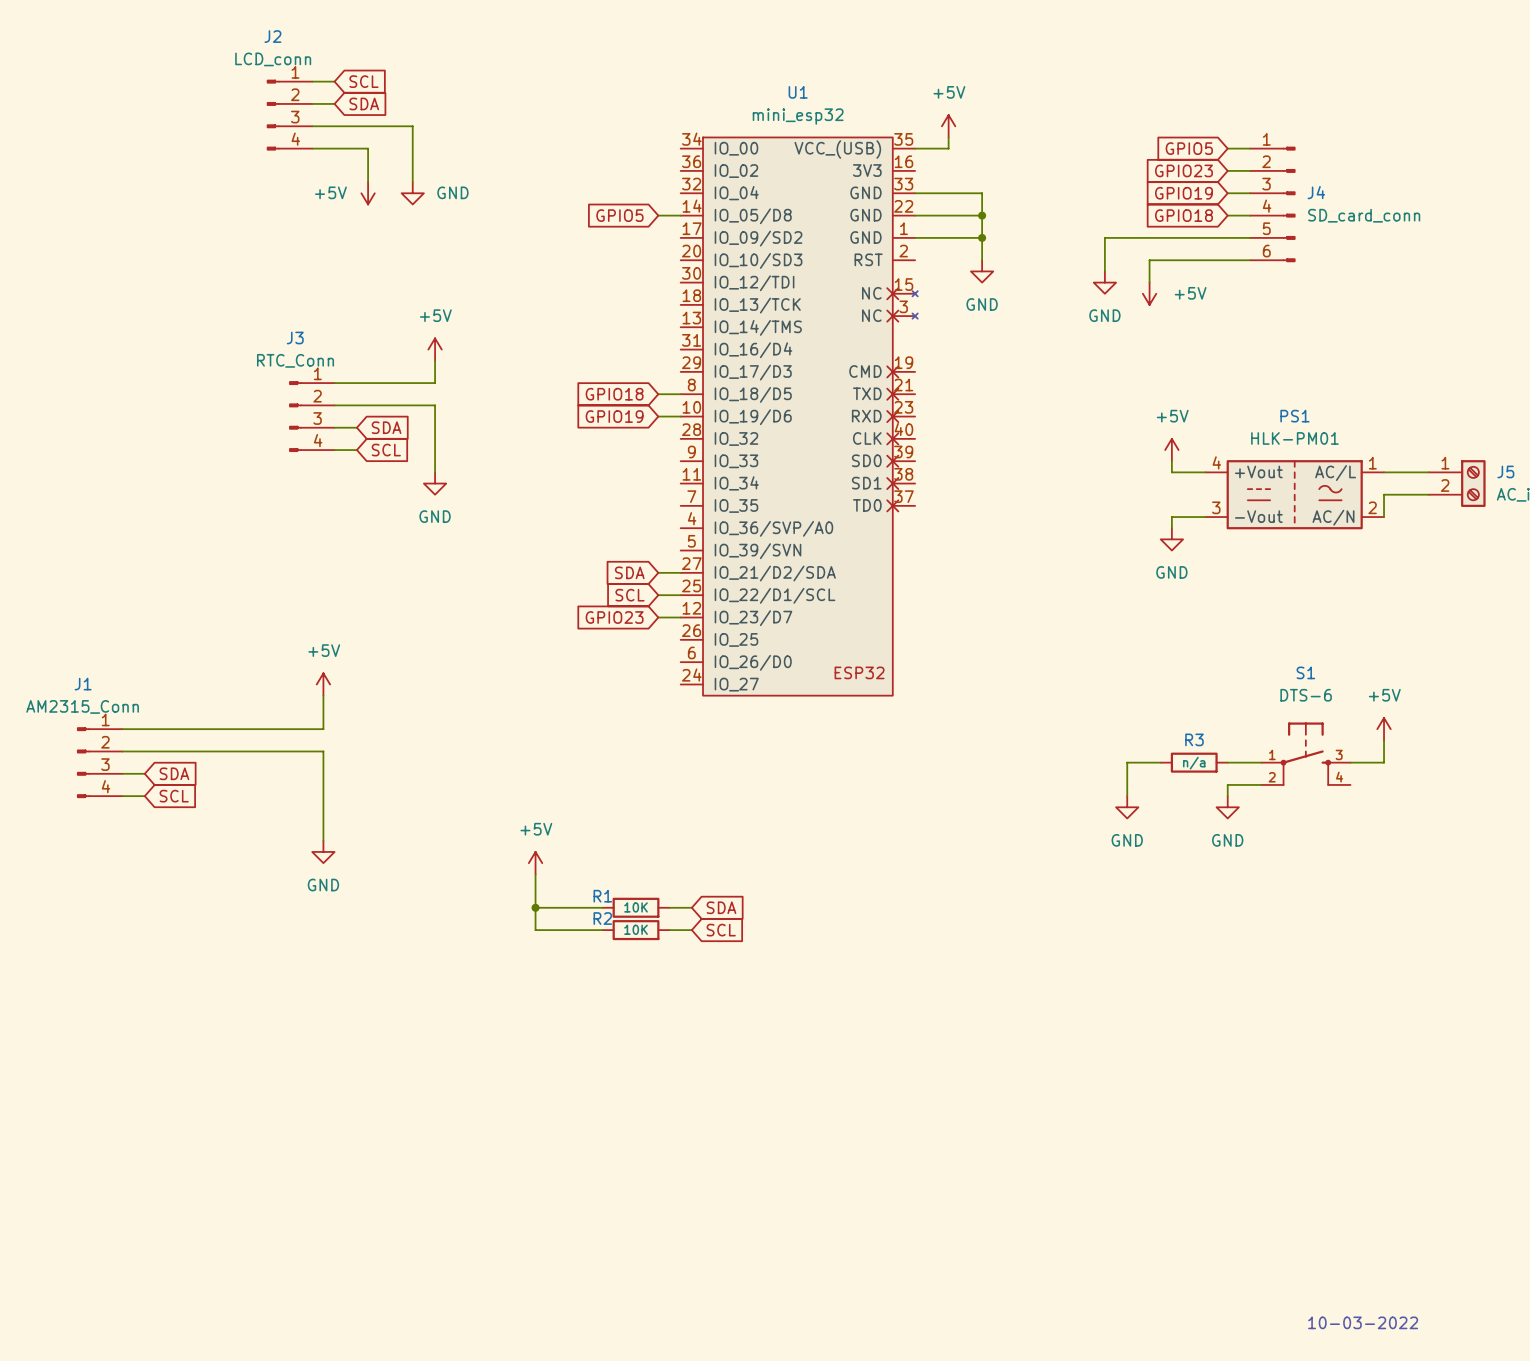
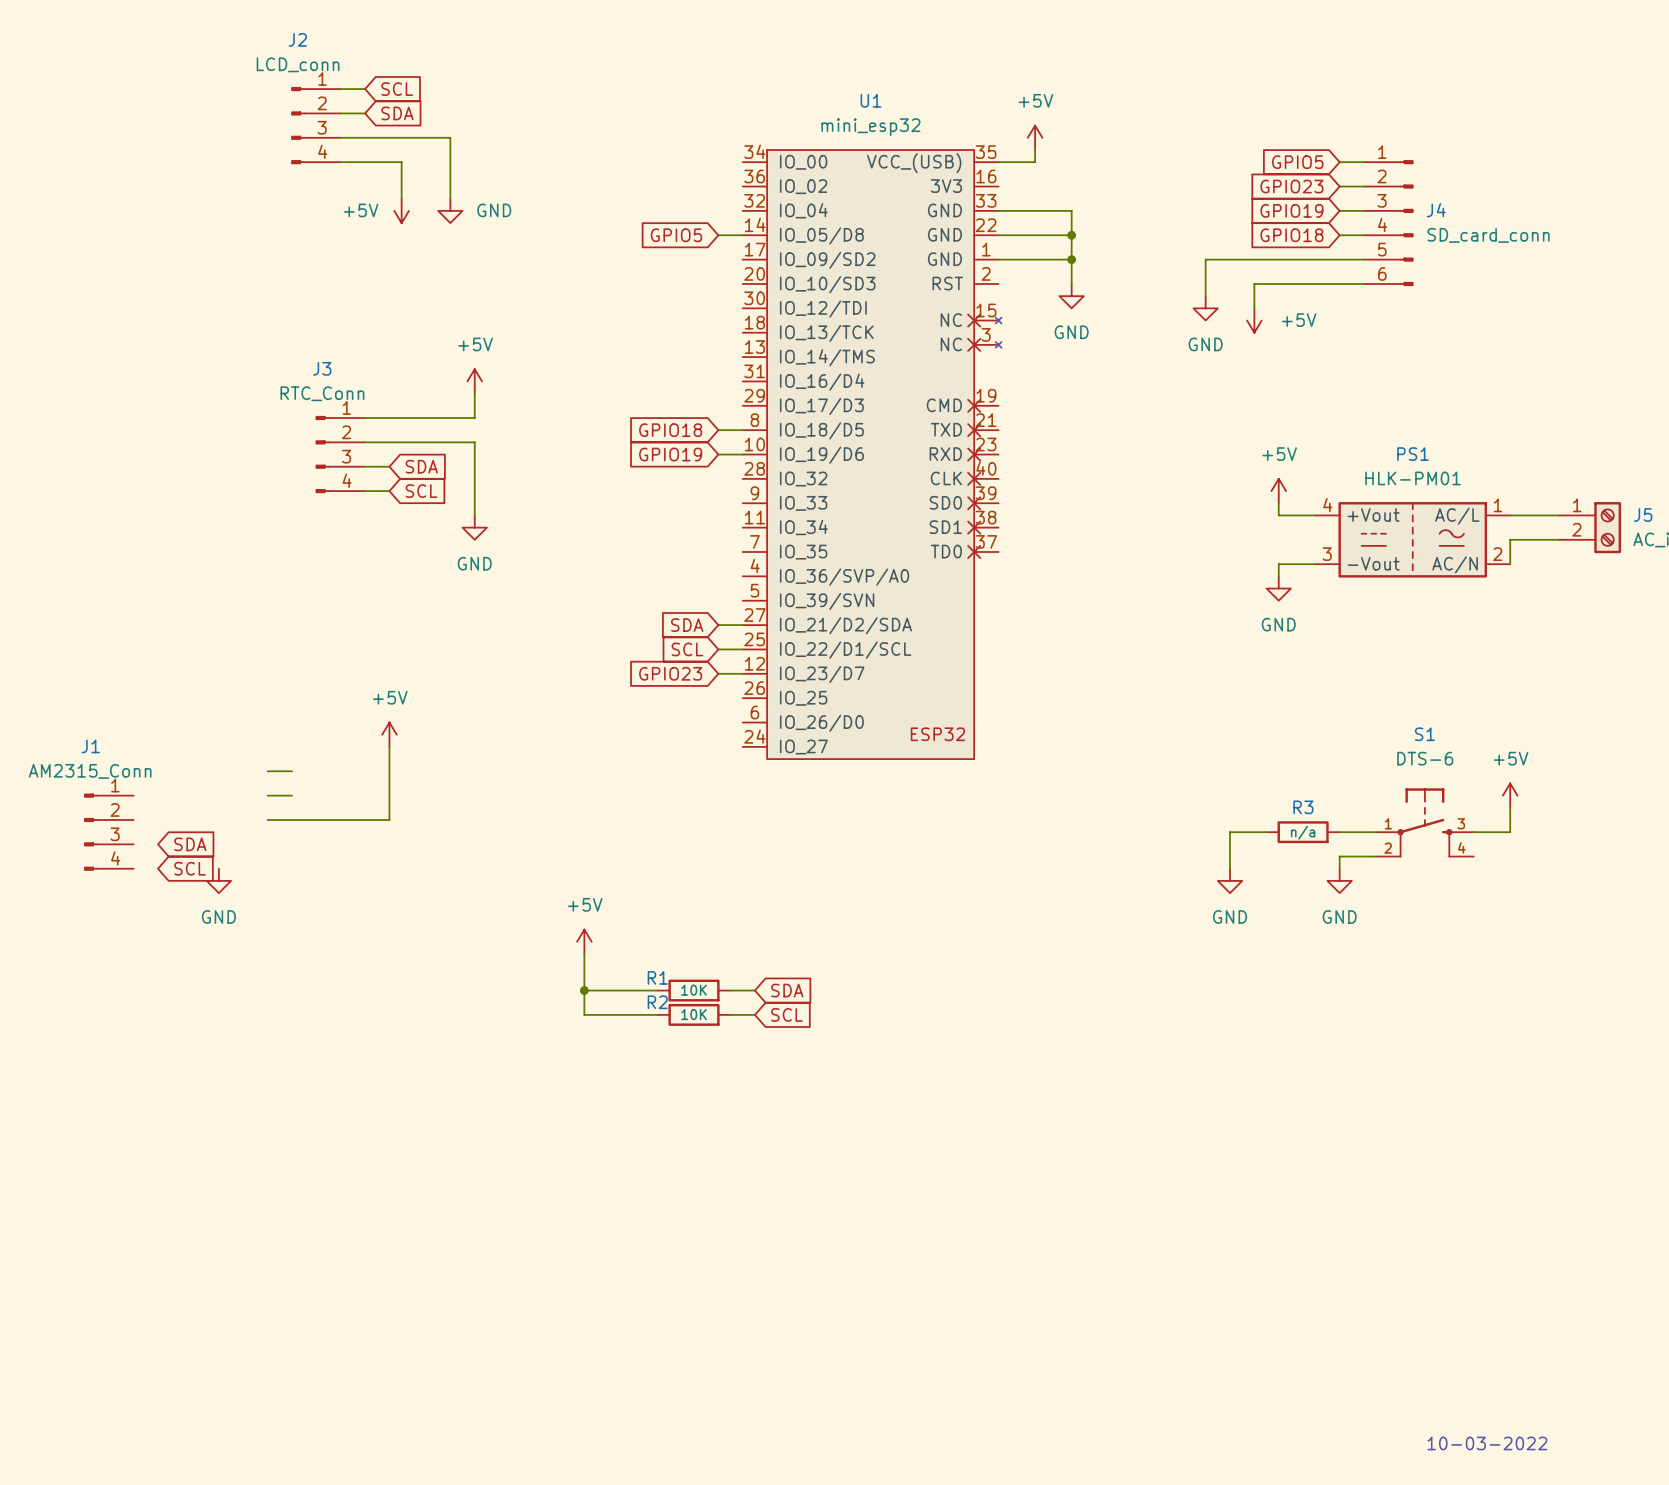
power symbol position: +5V (323, 684) -> +5V (389, 734)
wire: (323, 695) (323, 729) (267, 729) -> none
wire: (122, 729) (245, 729) -> none
wire: (122, 751) (245, 751) -> none
wire: (323, 751) (323, 840) -> (352, 820) (389, 820) (389, 746)
wire: (122, 773) (144, 773) -> (267, 771) (292, 771)
wire: (122, 796) (144, 796) -> none
power symbol position: GND (323, 851) -> GND (218, 880)

